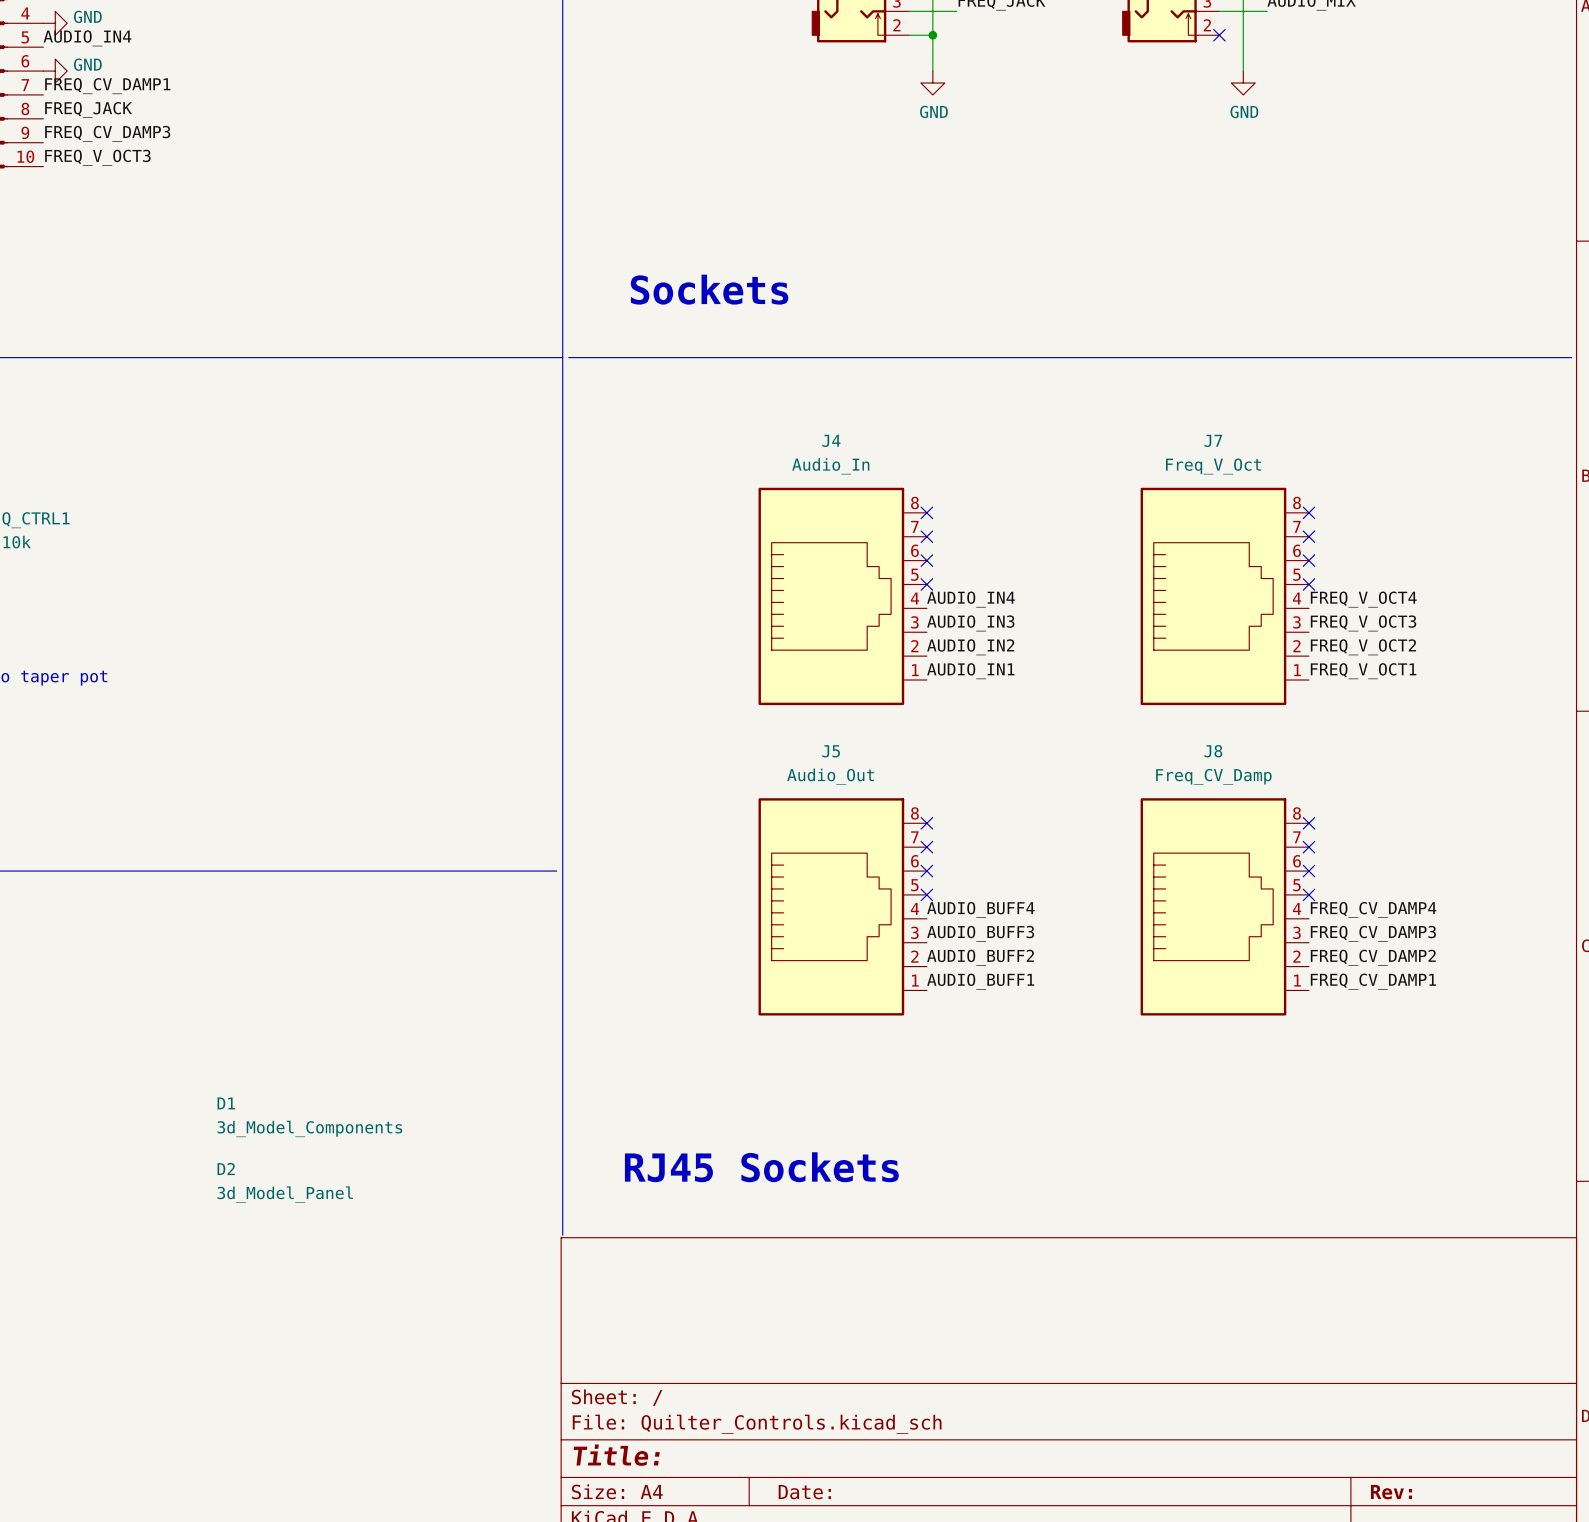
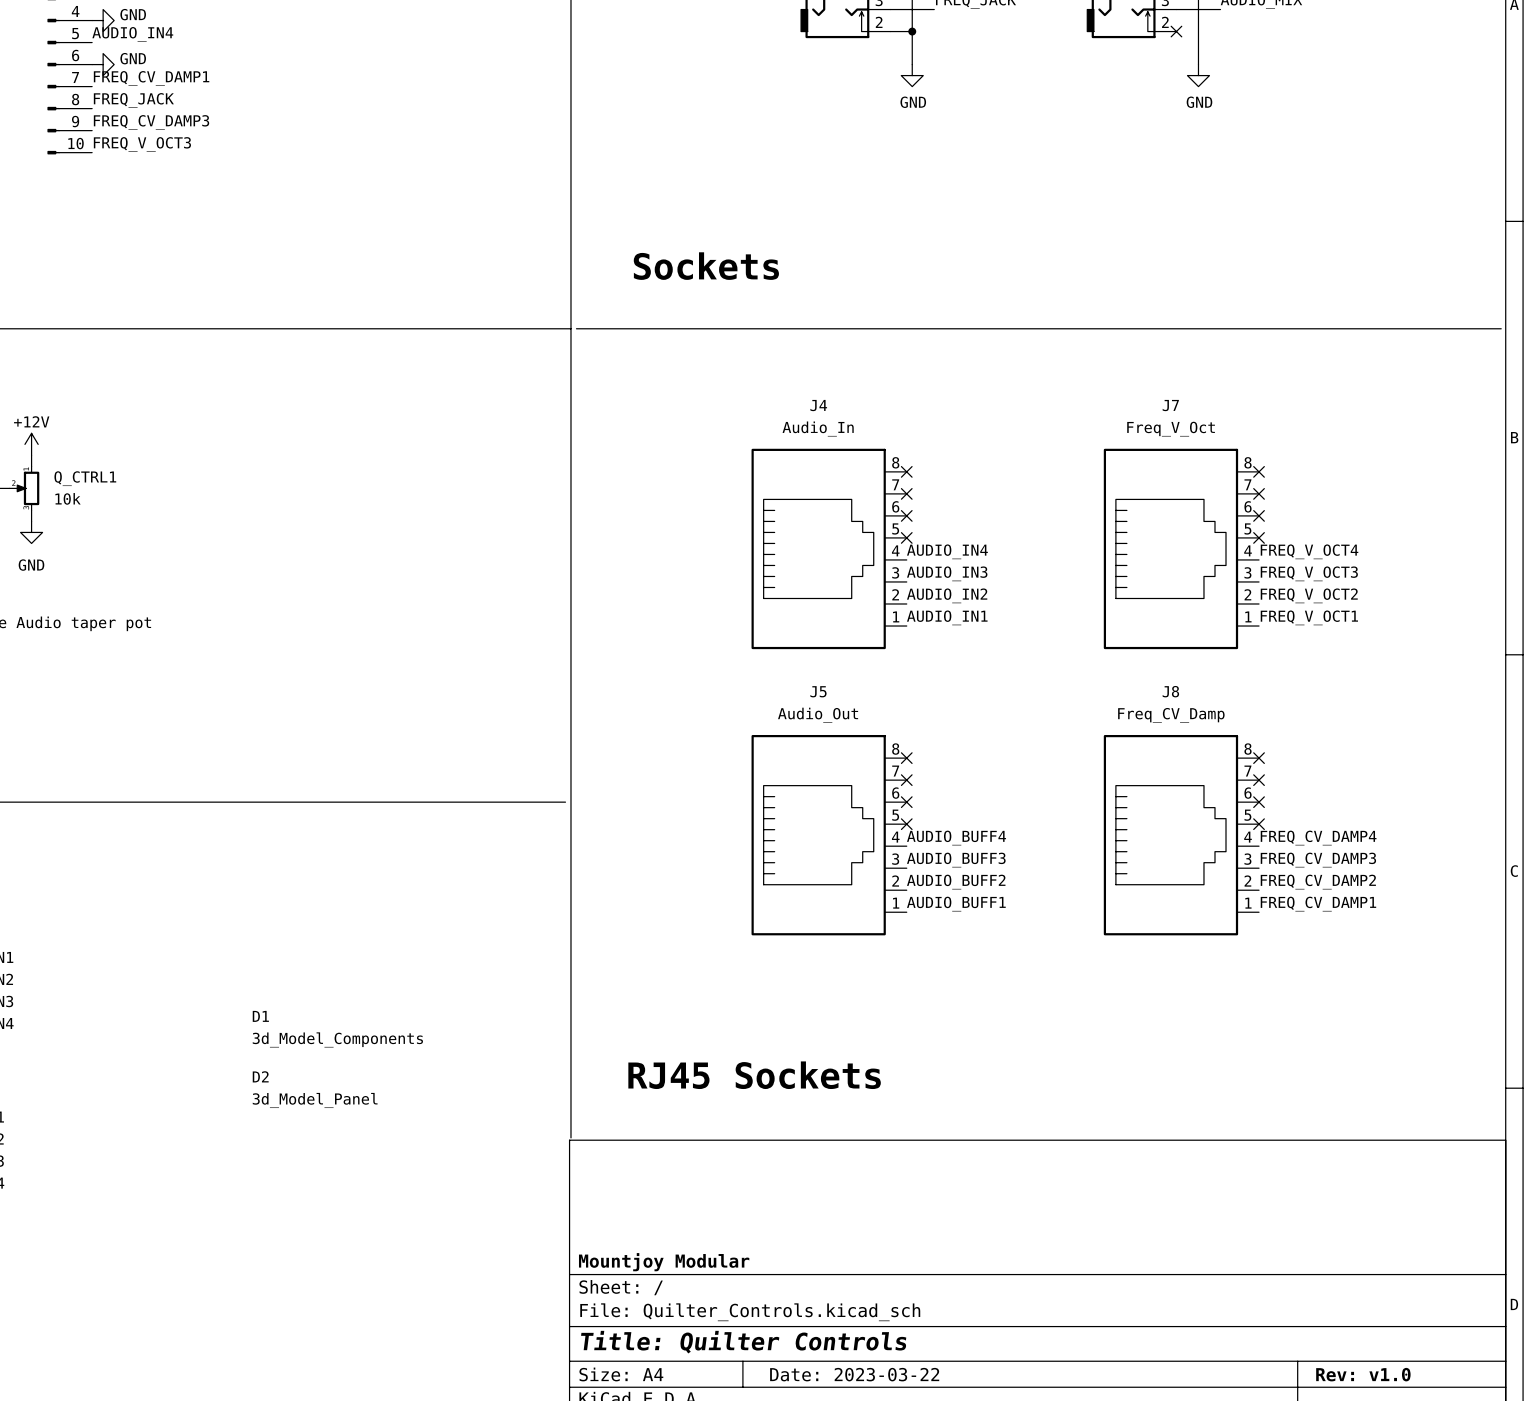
title block: none -> Mountjoy Modular (664, 1262)
title block: Title: (616, 1455) -> Title: Quilter Controls (743, 1342)
title block: Date: (804, 1492) -> Date: 2023-03-22 (854, 1374)
title block: Rev: (1391, 1492) -> Rev: v1.0 (1363, 1374)

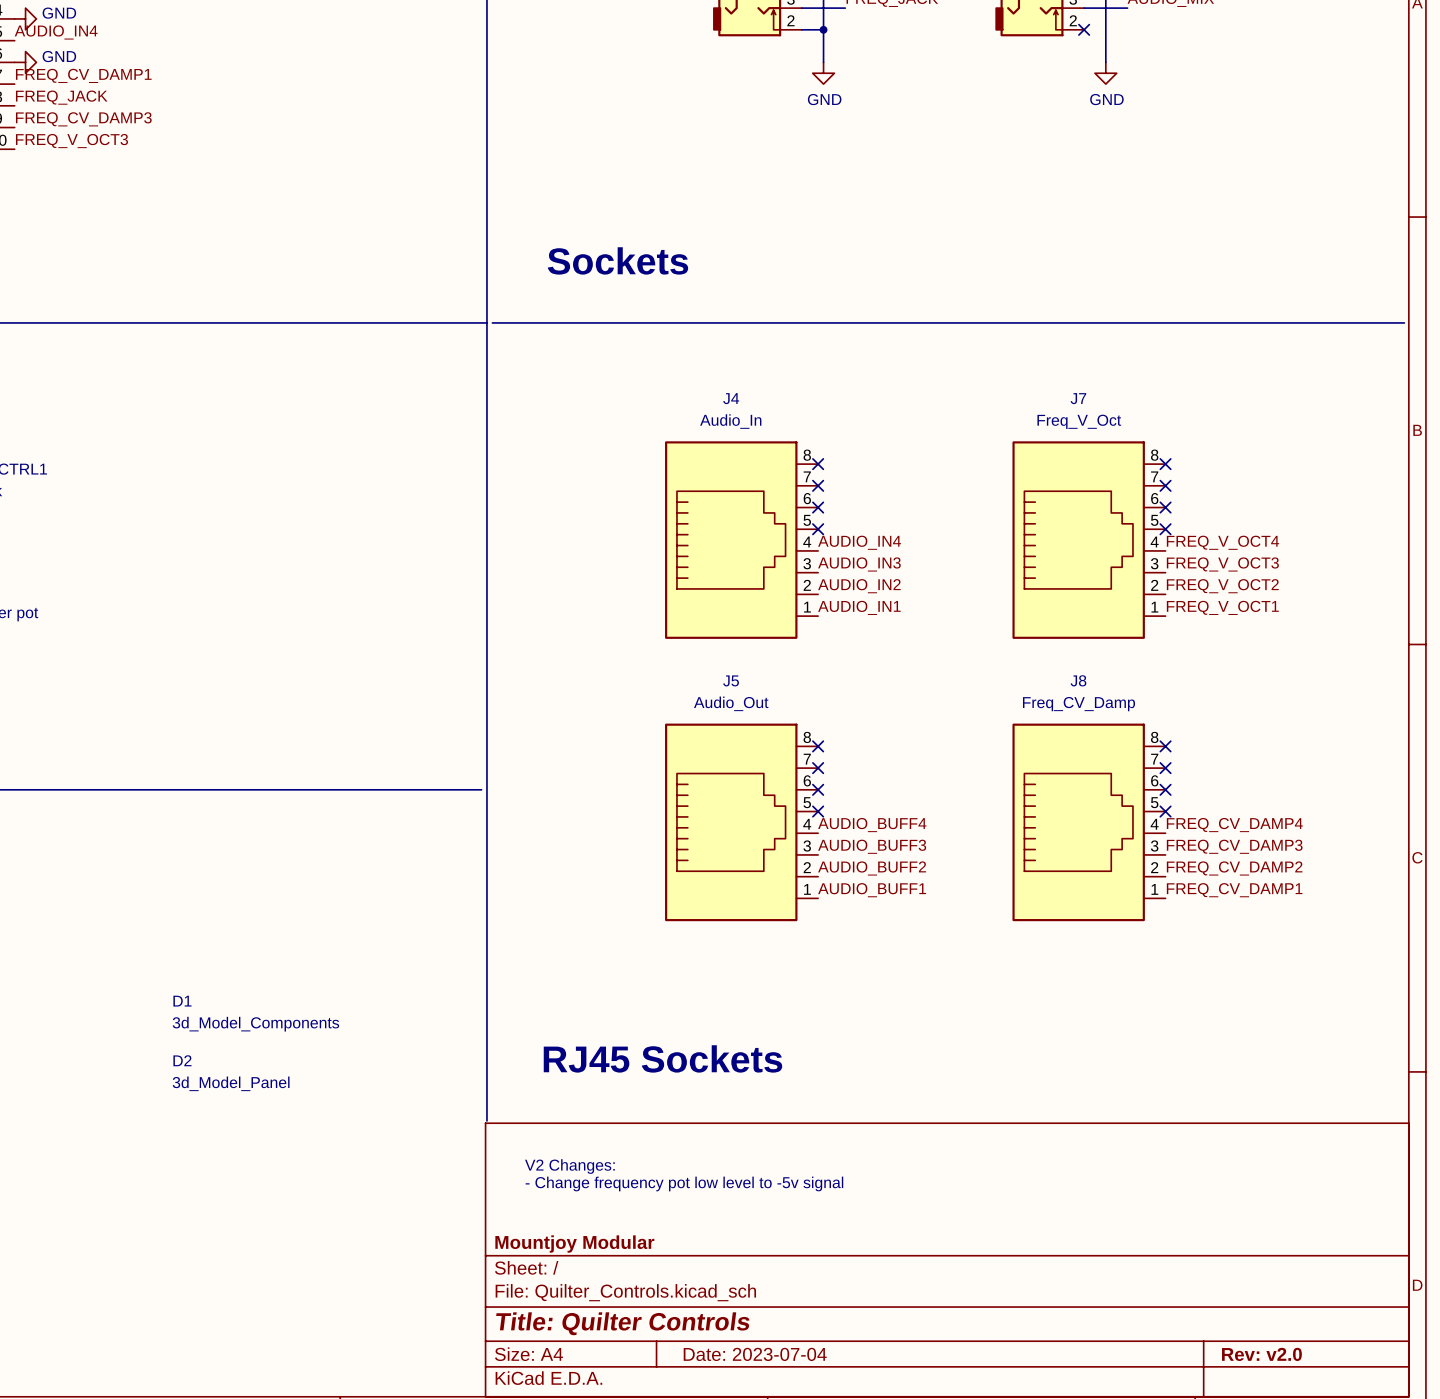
text: none -> V2 Changes: (569, 1166)
text: none -> - Change frequency pot low level to -5v signal (684, 1183)
title block: Date: 2023-03-22 (854, 1374) -> Date: 2023-07-04 (755, 1354)
title block: Rev: v1.0 (1363, 1374) -> Rev: v2.0 (1261, 1354)

